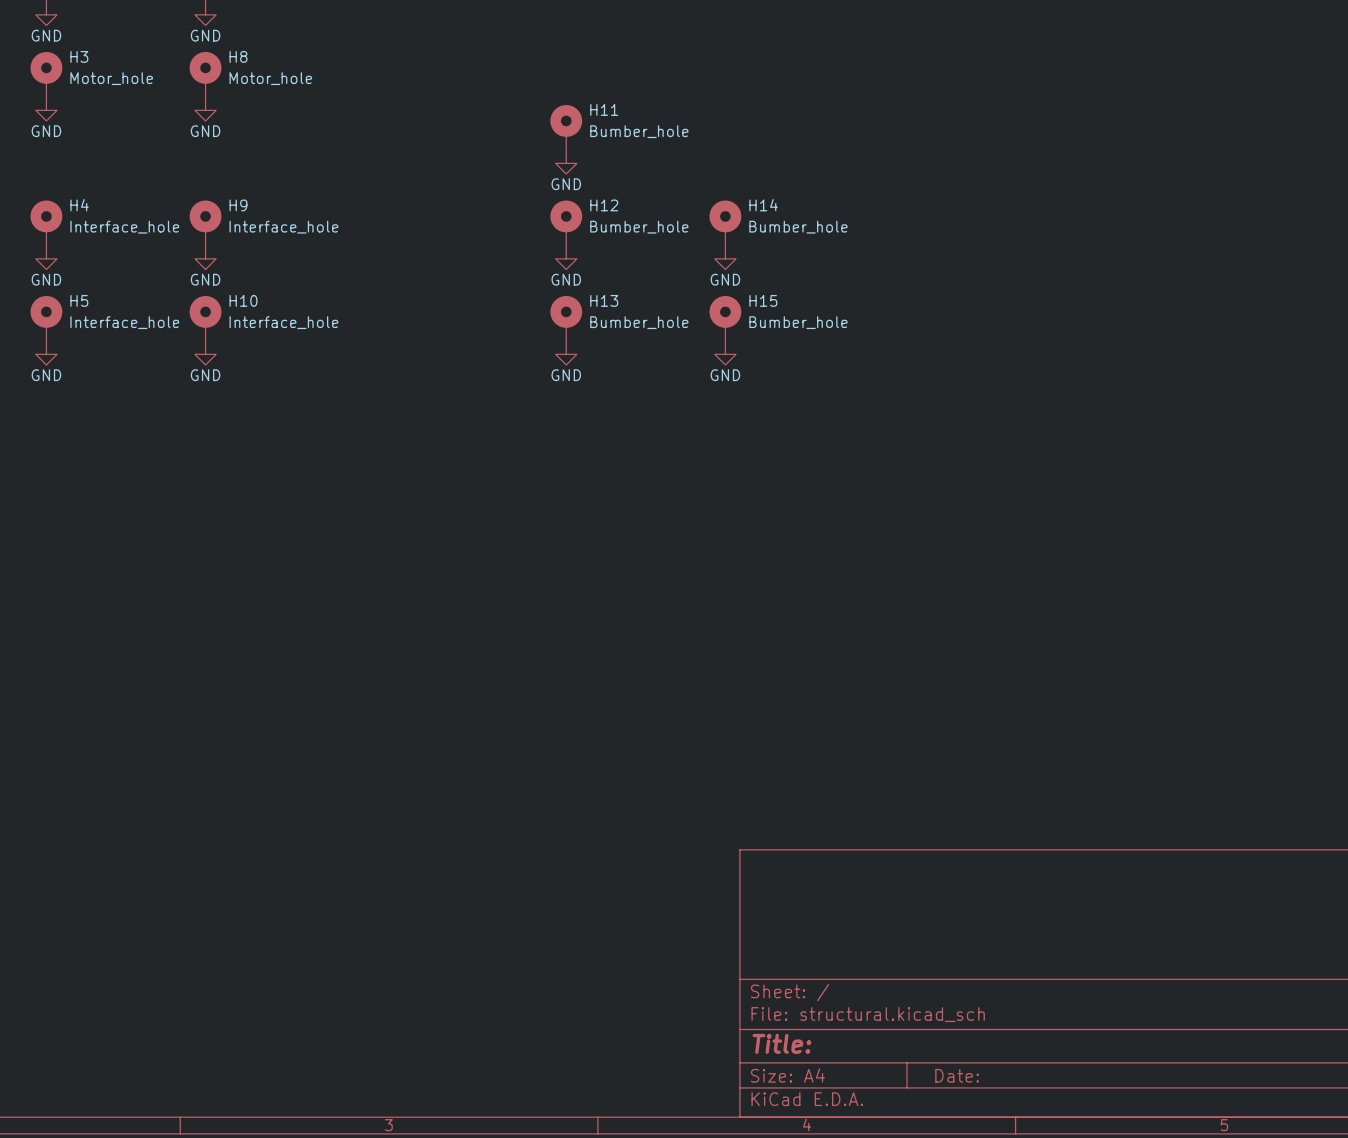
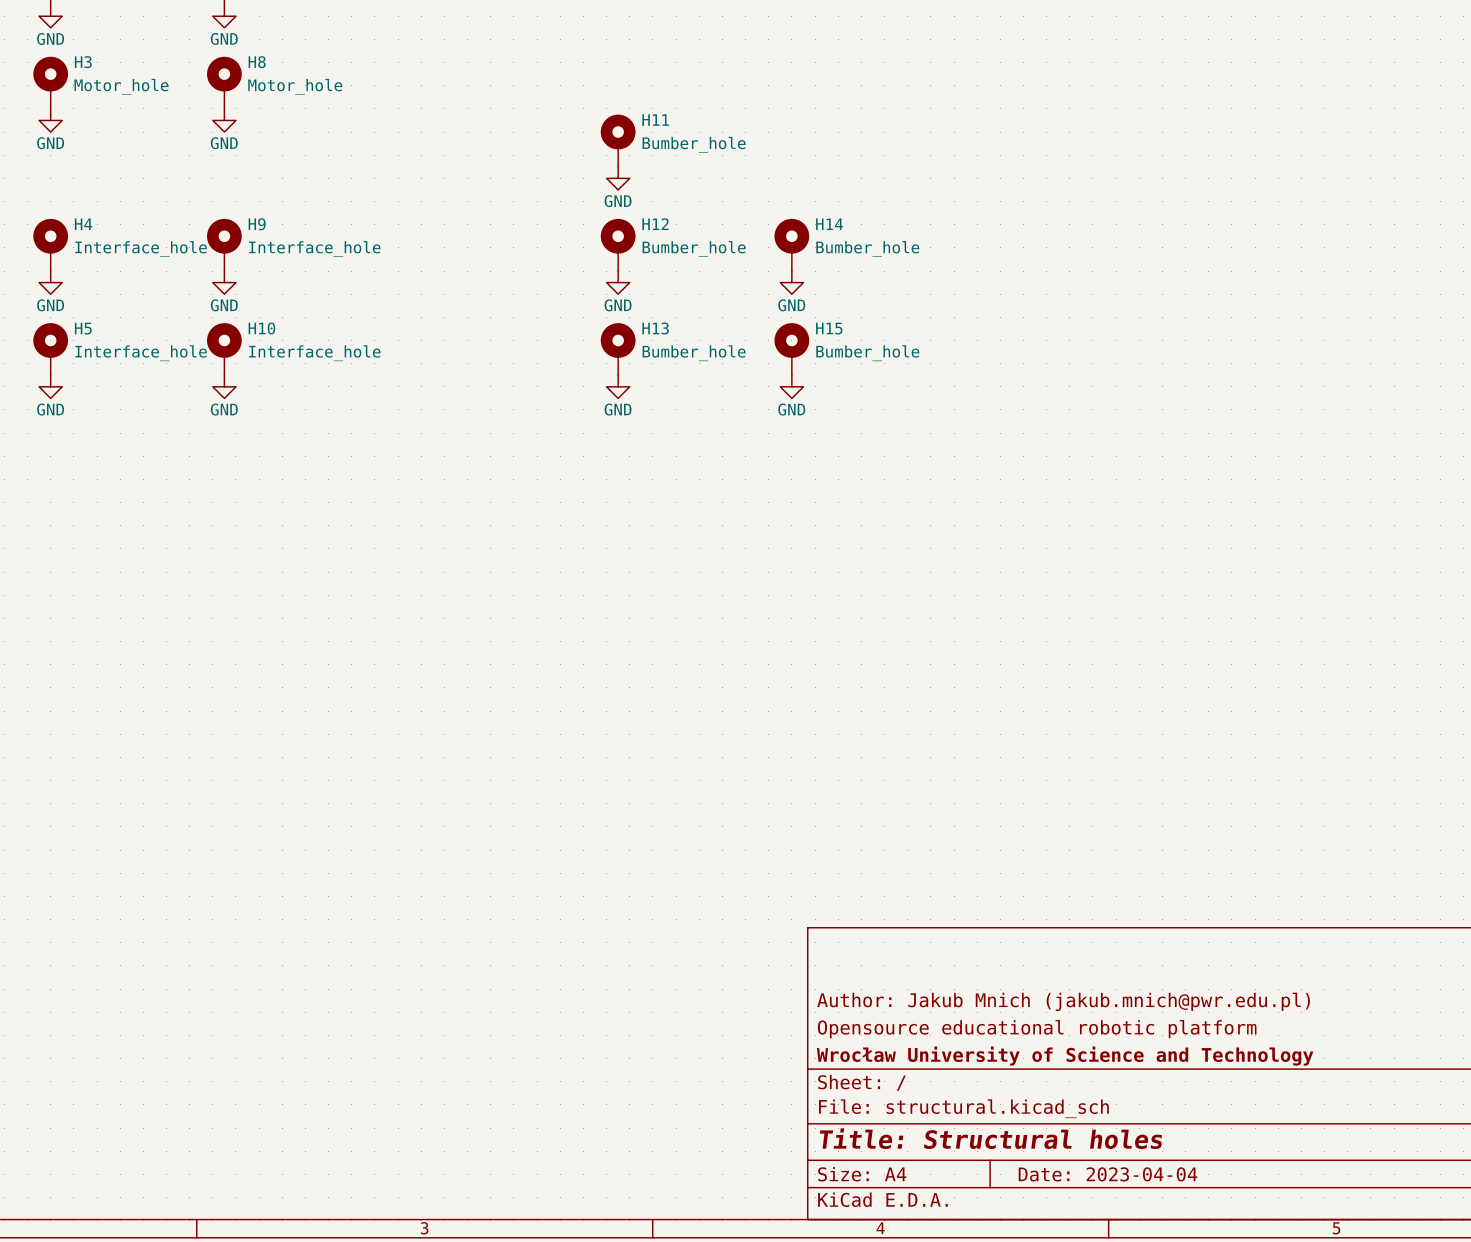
title block: none -> Author: Jakub Mnich (jakub.mnich@pwr.edu.pl) (1063, 1001)
title block: none -> Opensource educational robotic platform (1037, 1029)
title block: none -> Wrocław University of Science and Technology (1065, 1056)
title block: Title: (781, 1043) -> Title: Structural holes (990, 1138)
title block: Date: (957, 1075) -> Date: 2023-04-04 (1108, 1174)

